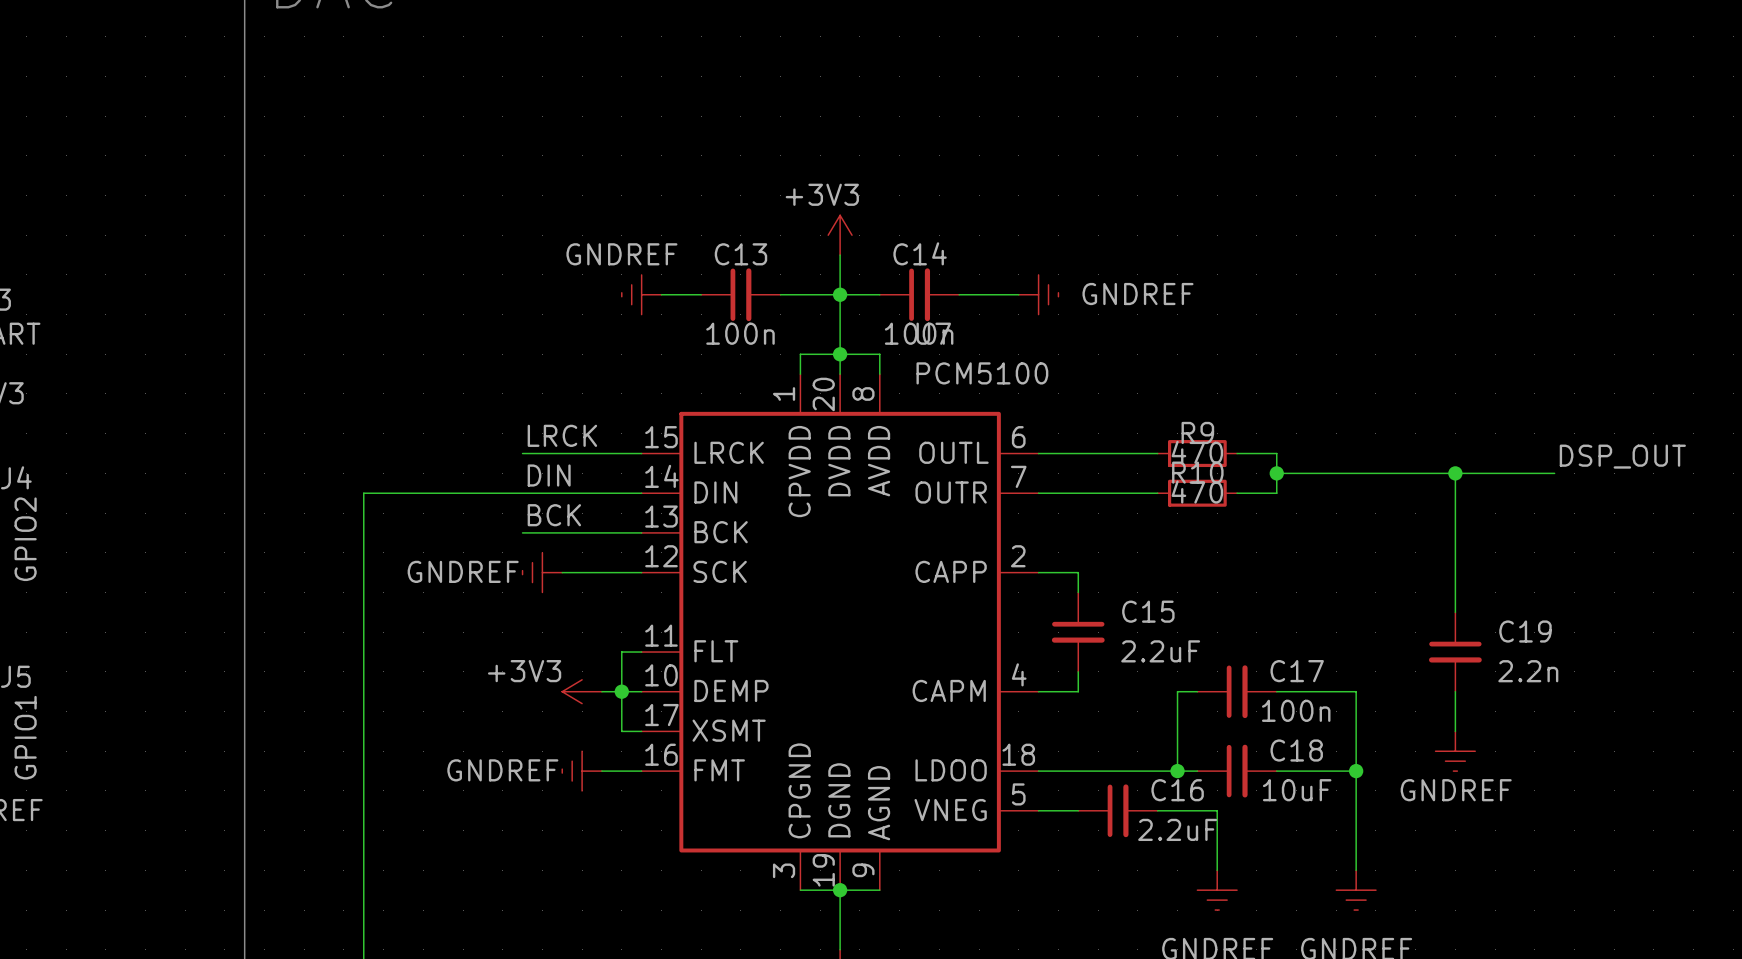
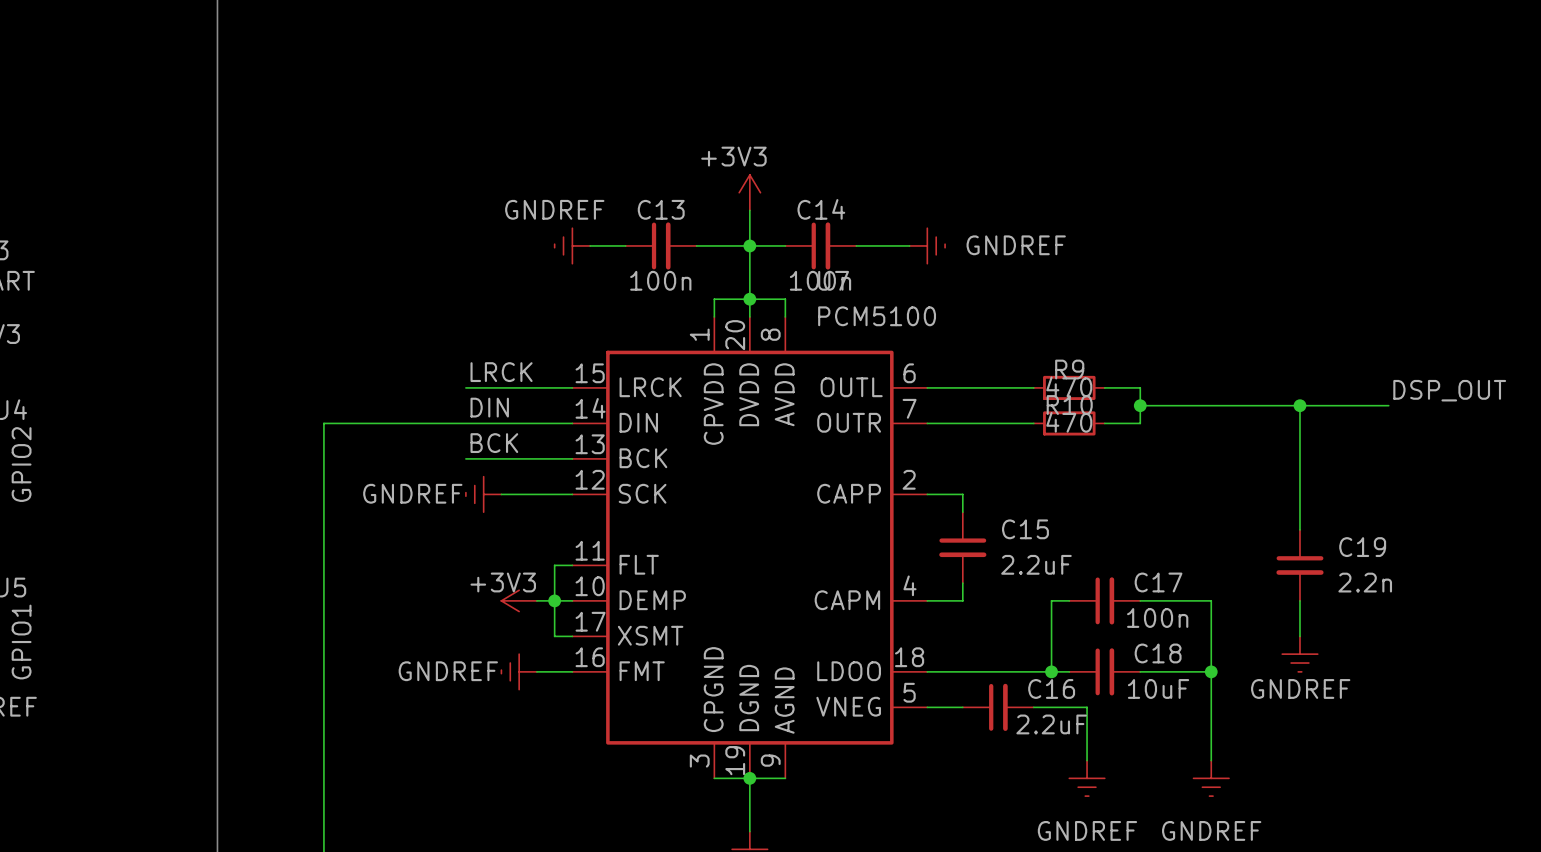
power symbol text position: +3V3 (524, 671) -> +3V3 (503, 582)

